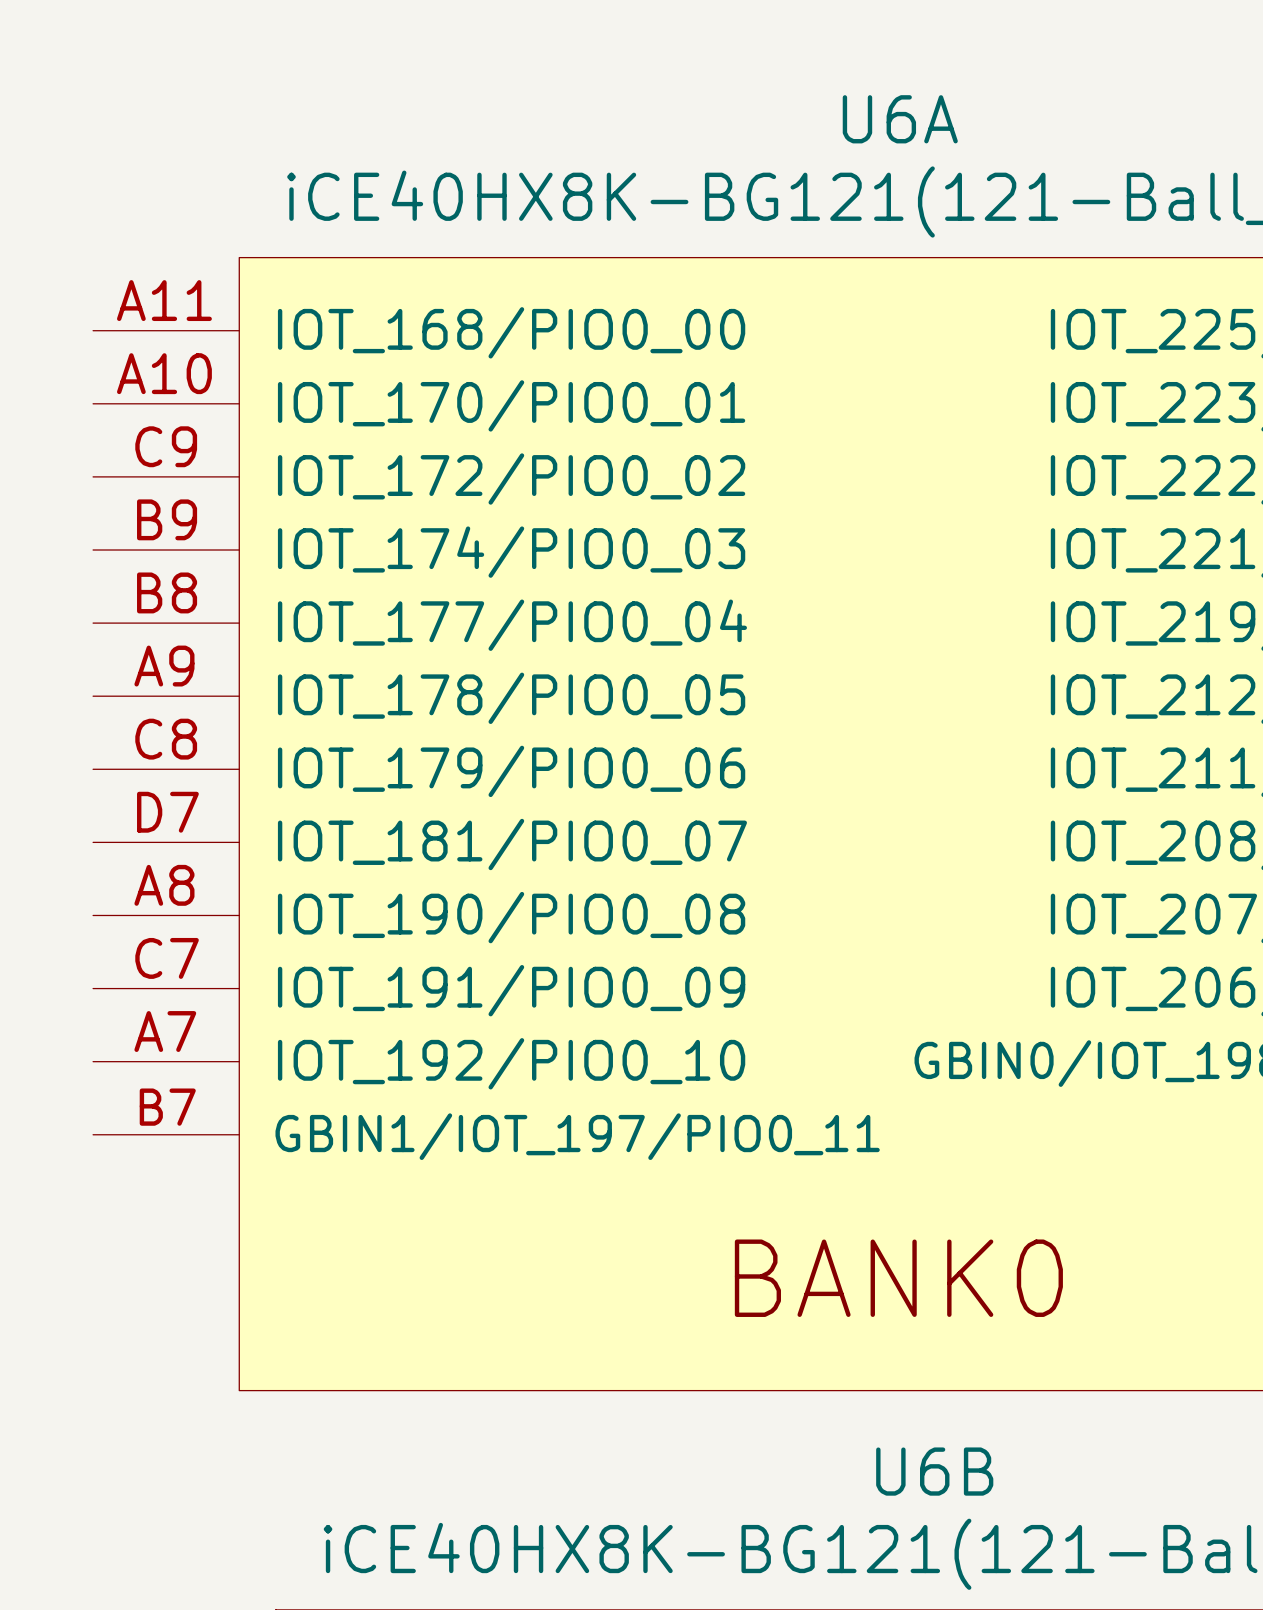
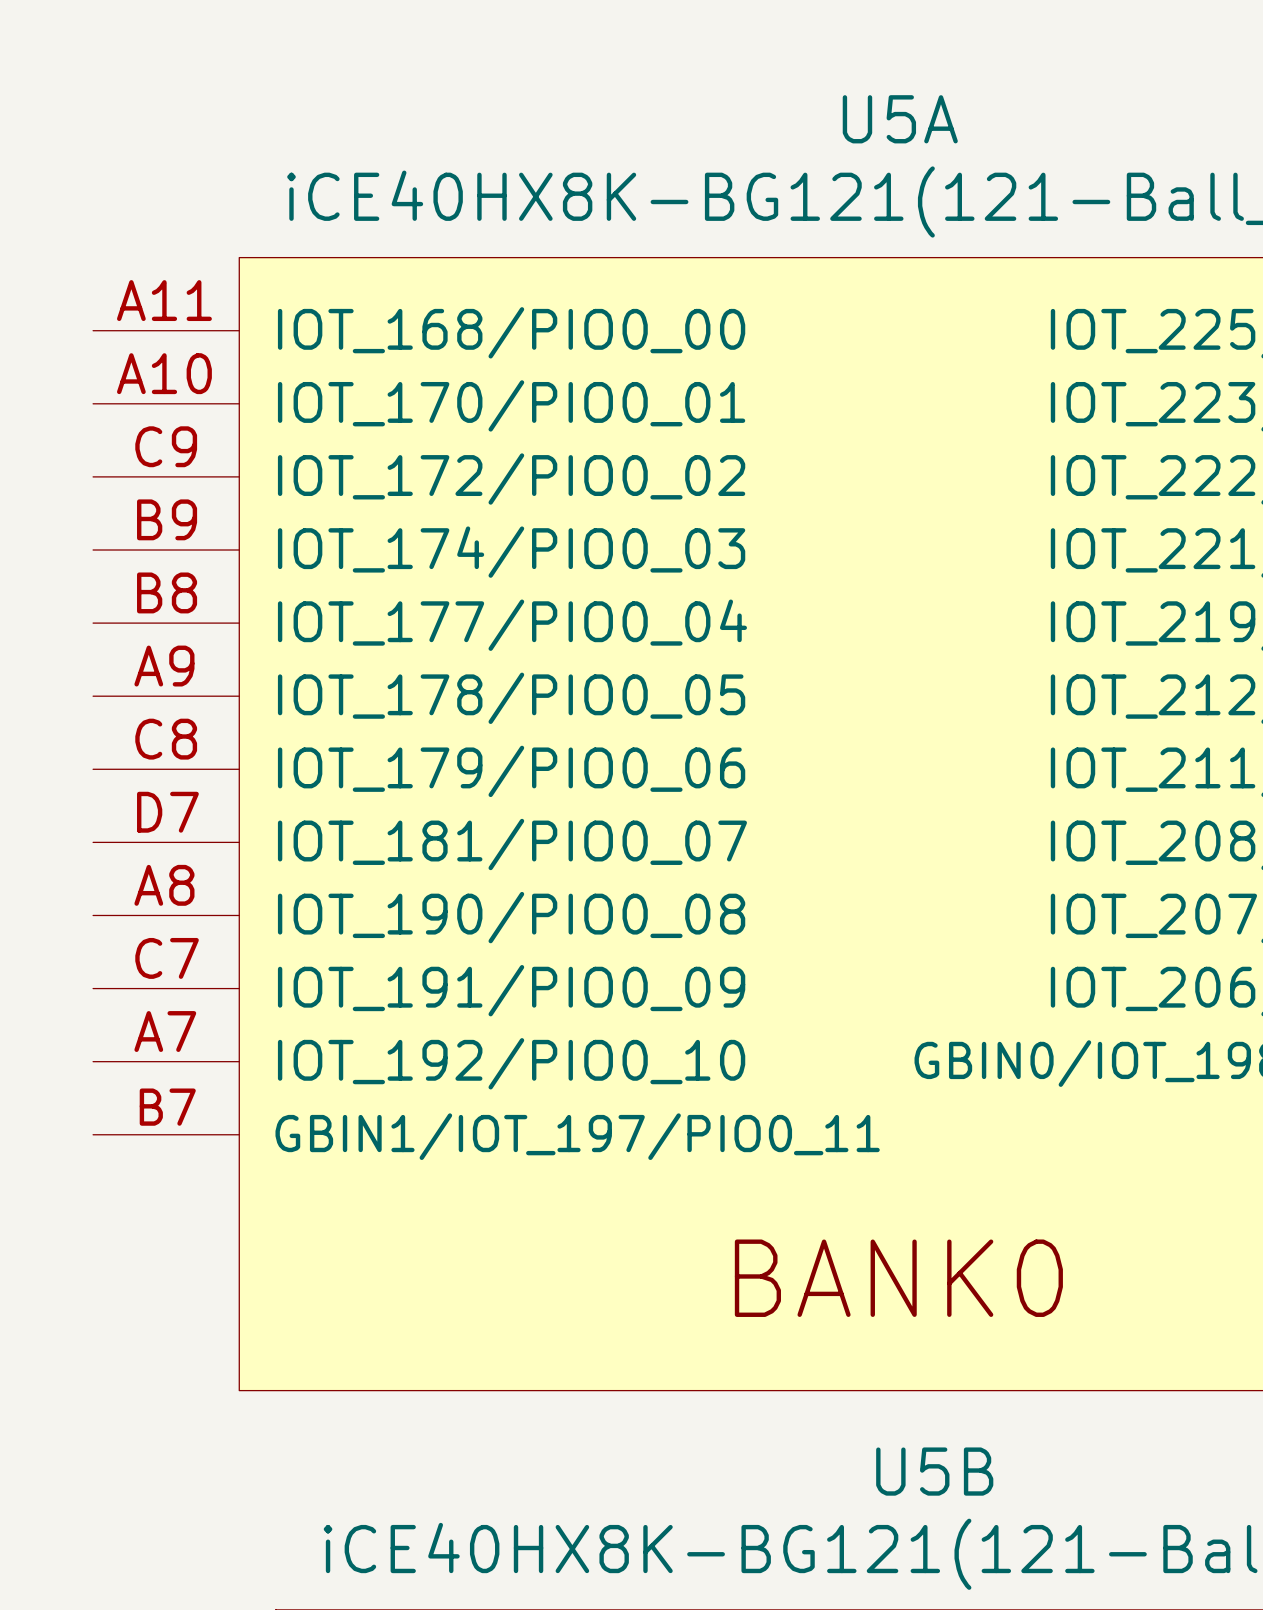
U6A name: U6A (900, 119) -> U5A (900, 119)
U6B name: U6B (934, 1471) -> U5B (934, 1471)

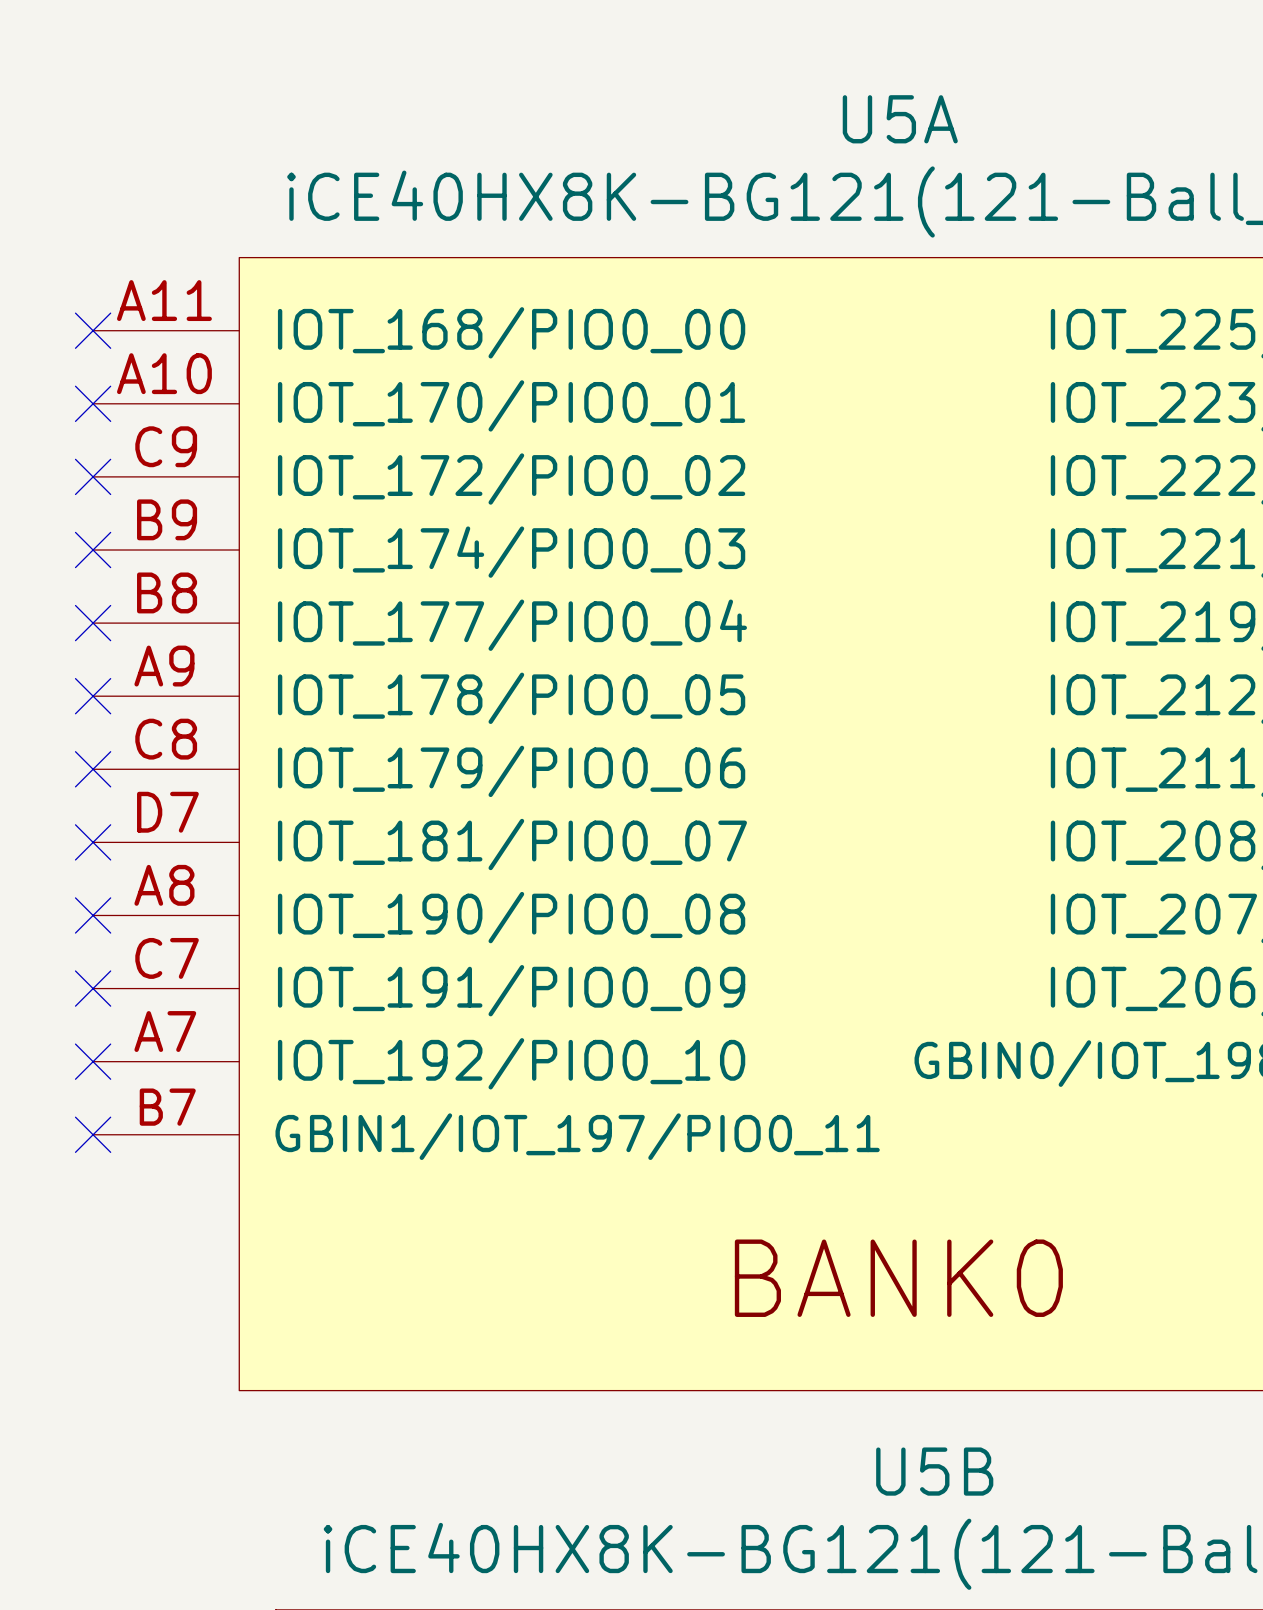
no-connect mark: none -> (93, 330)
no-connect mark: none -> (93, 403)
no-connect mark: none -> (93, 476)
no-connect mark: none -> (93, 550)
no-connect mark: none -> (93, 623)
no-connect mark: none -> (93, 696)
no-connect mark: none -> (93, 769)
no-connect mark: none -> (93, 842)
no-connect mark: none -> (93, 915)
no-connect mark: none -> (93, 988)
no-connect mark: none -> (93, 1061)
no-connect mark: none -> (93, 1134)

